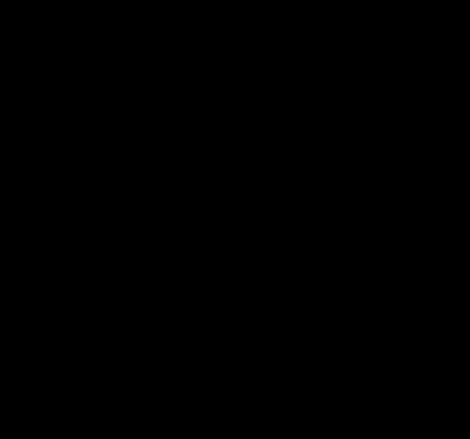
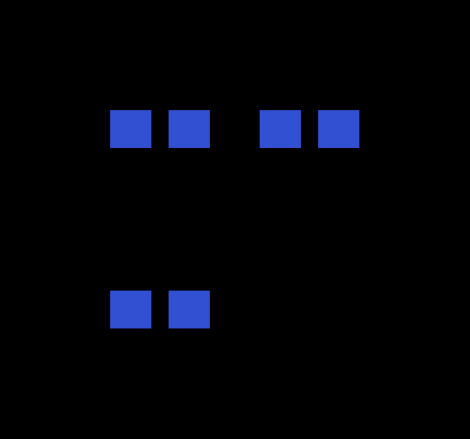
part: none -> (159, 129)
part: none -> (309, 129)
part: none -> (159, 309)

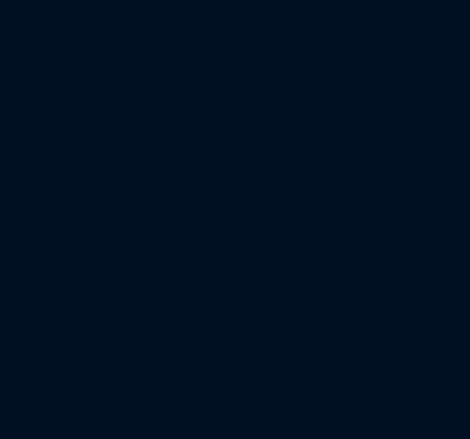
part: (159, 129) -> none
part: (309, 129) -> none
part: (159, 309) -> none

